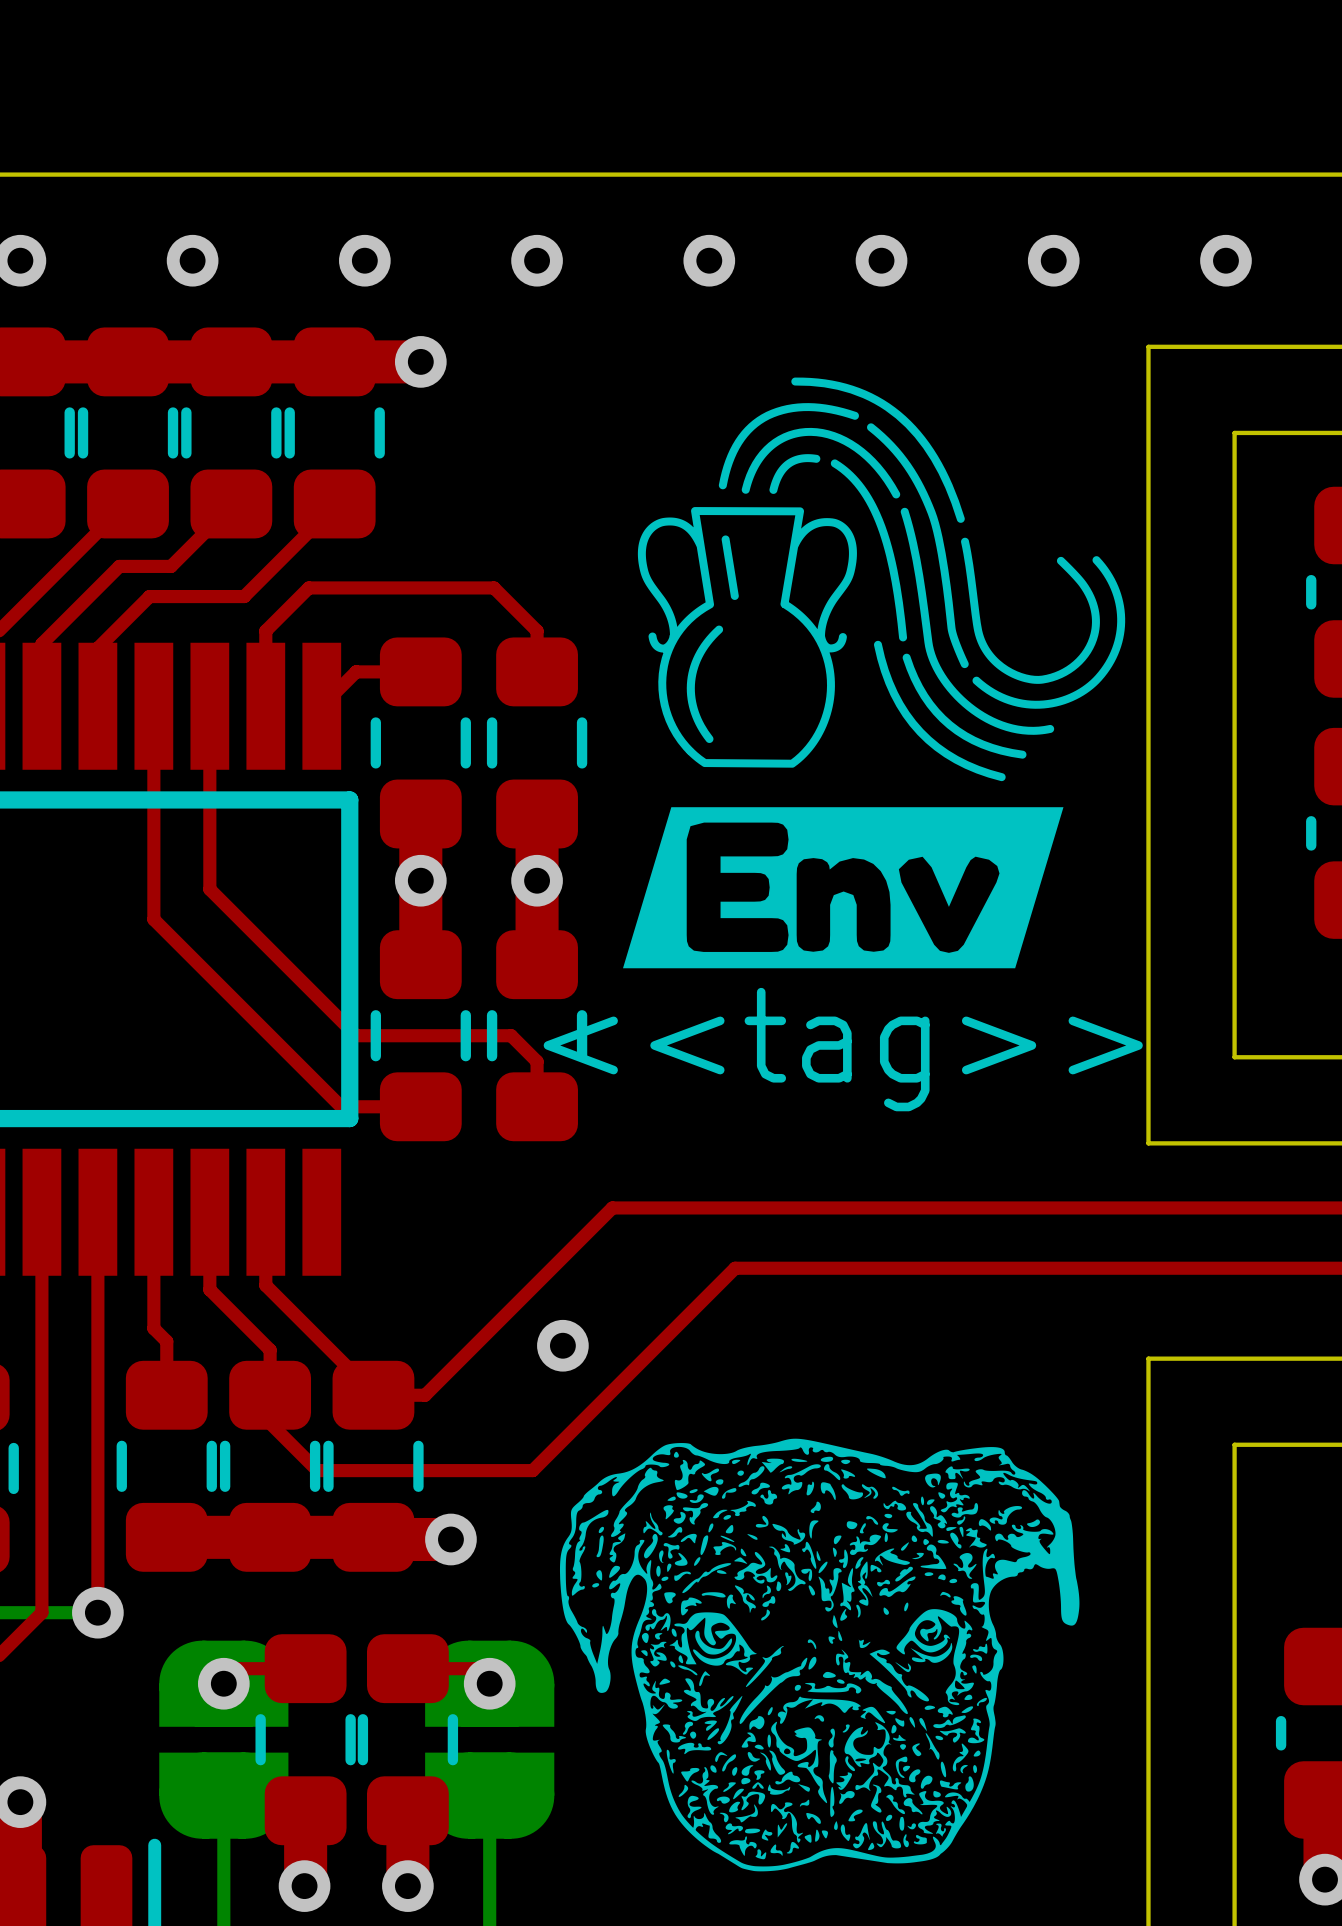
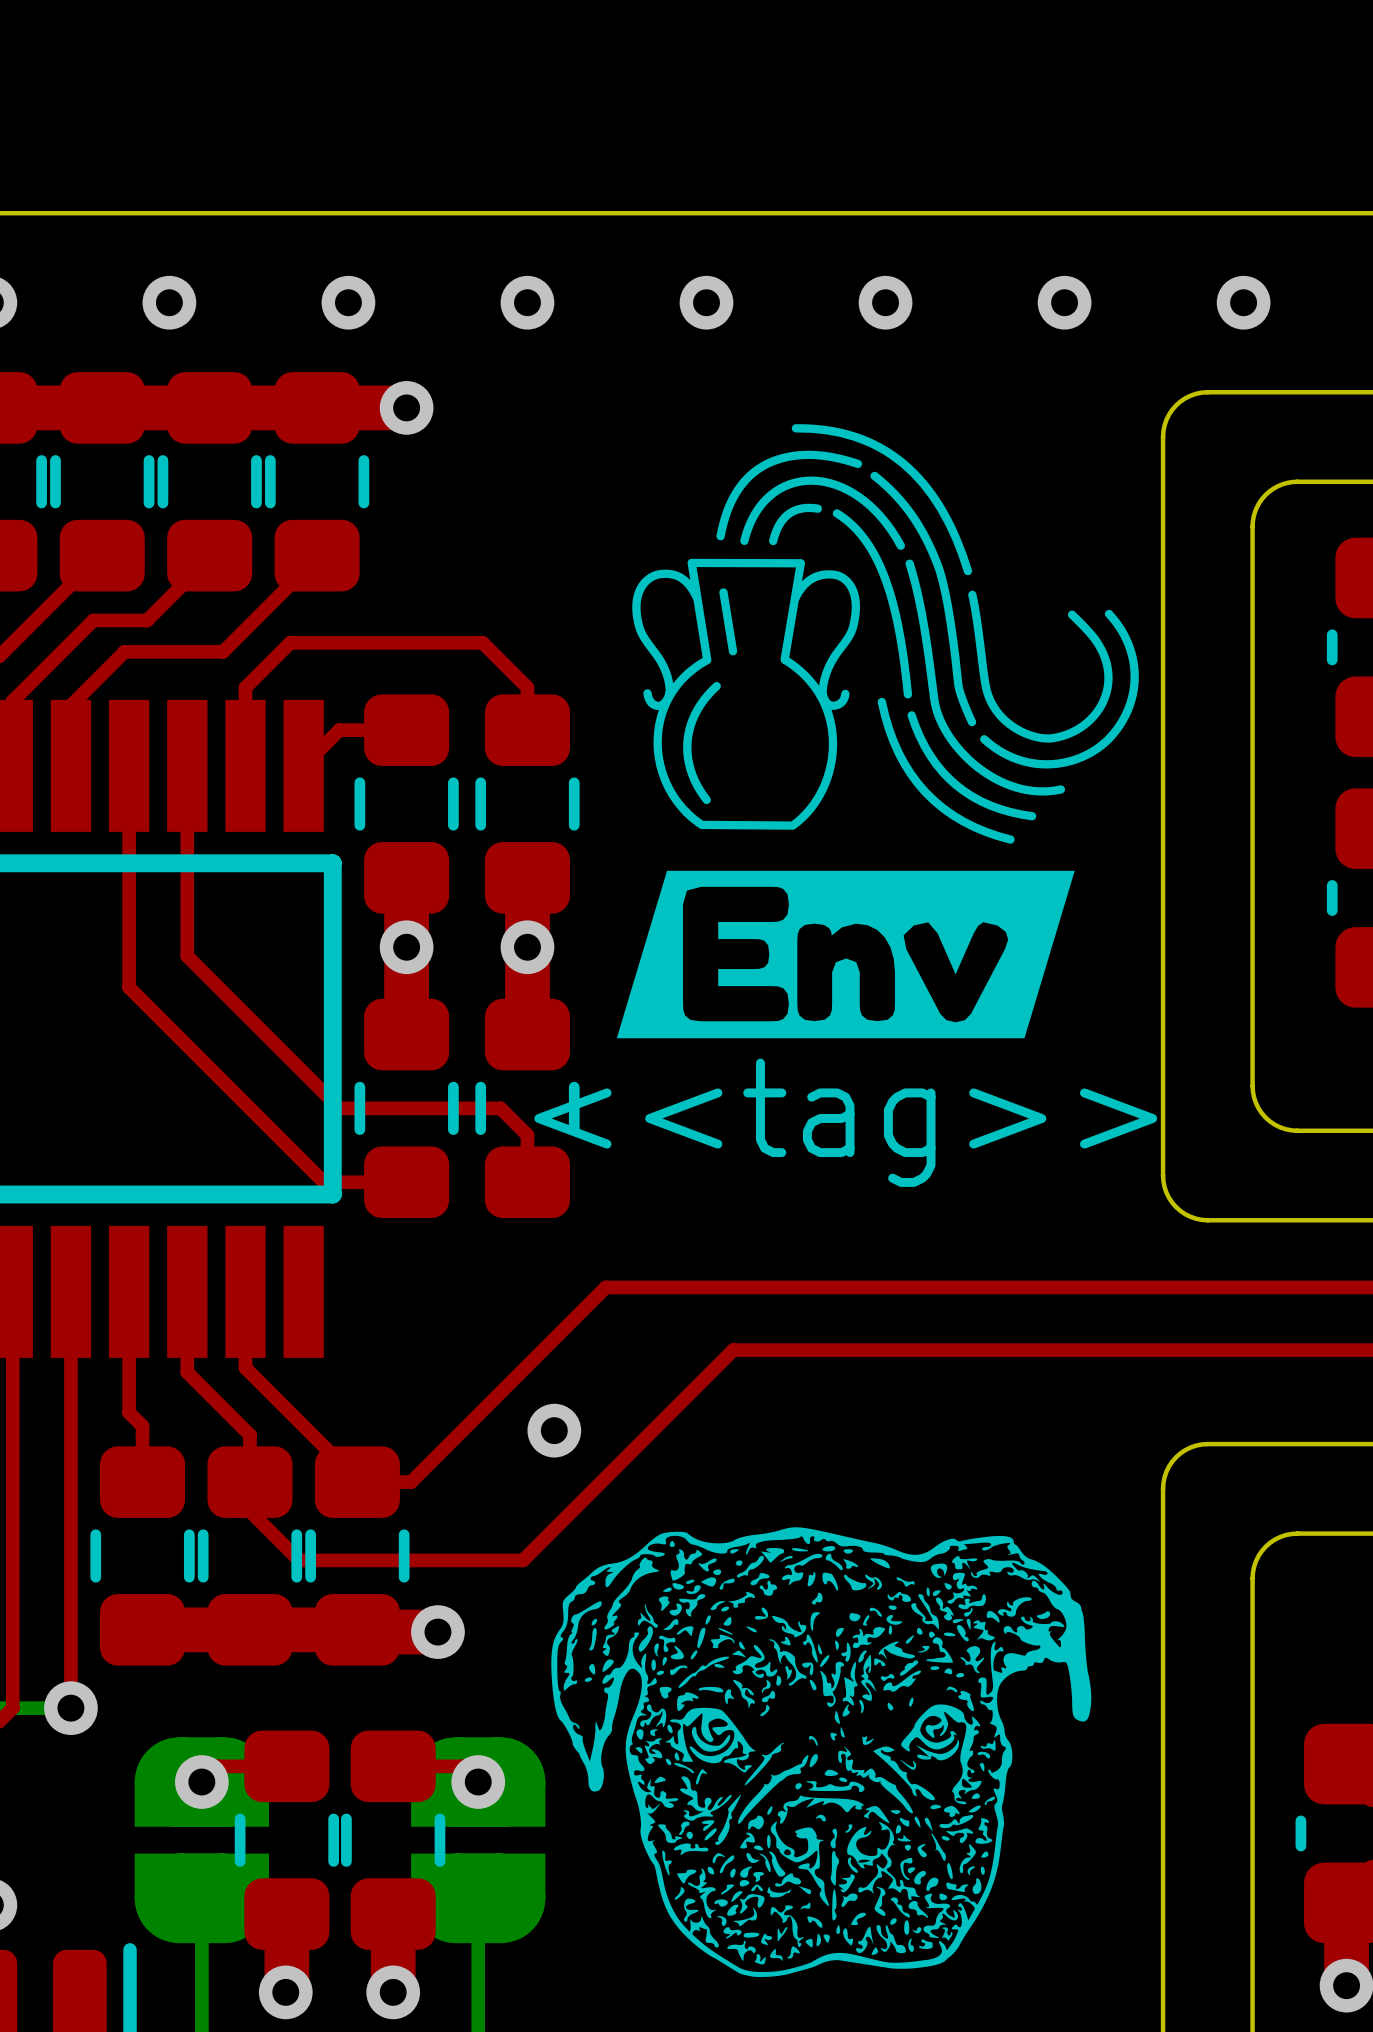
board edge: (1191, 346) (1148, 346) (1148, 389) -> (1207, 392) (1190, 395) (1176, 405) (1166, 419) (1163, 437)
board edge: (1277, 432) (1234, 432) (1234, 475) -> (1297, 481) (1277, 486) (1265, 494) (1257, 507) (1252, 526)
board edge: (1234, 1014) (1234, 1057) (1277, 1057) -> (1252, 1086) (1255, 1103) (1265, 1117) (1280, 1127) (1297, 1130)
board edge: (1148, 1100) (1148, 1143) (1191, 1143) -> (1163, 1175) (1166, 1192) (1176, 1207) (1190, 1216) (1207, 1220)
board edge: (1191, 1358) (1148, 1358) (1148, 1401) -> (1207, 1444) (1190, 1447) (1176, 1457) (1166, 1471) (1163, 1488)
board edge: (1277, 1444) (1234, 1444) (1234, 1487) -> (1297, 1533) (1280, 1537) (1265, 1546) (1255, 1561) (1252, 1578)

